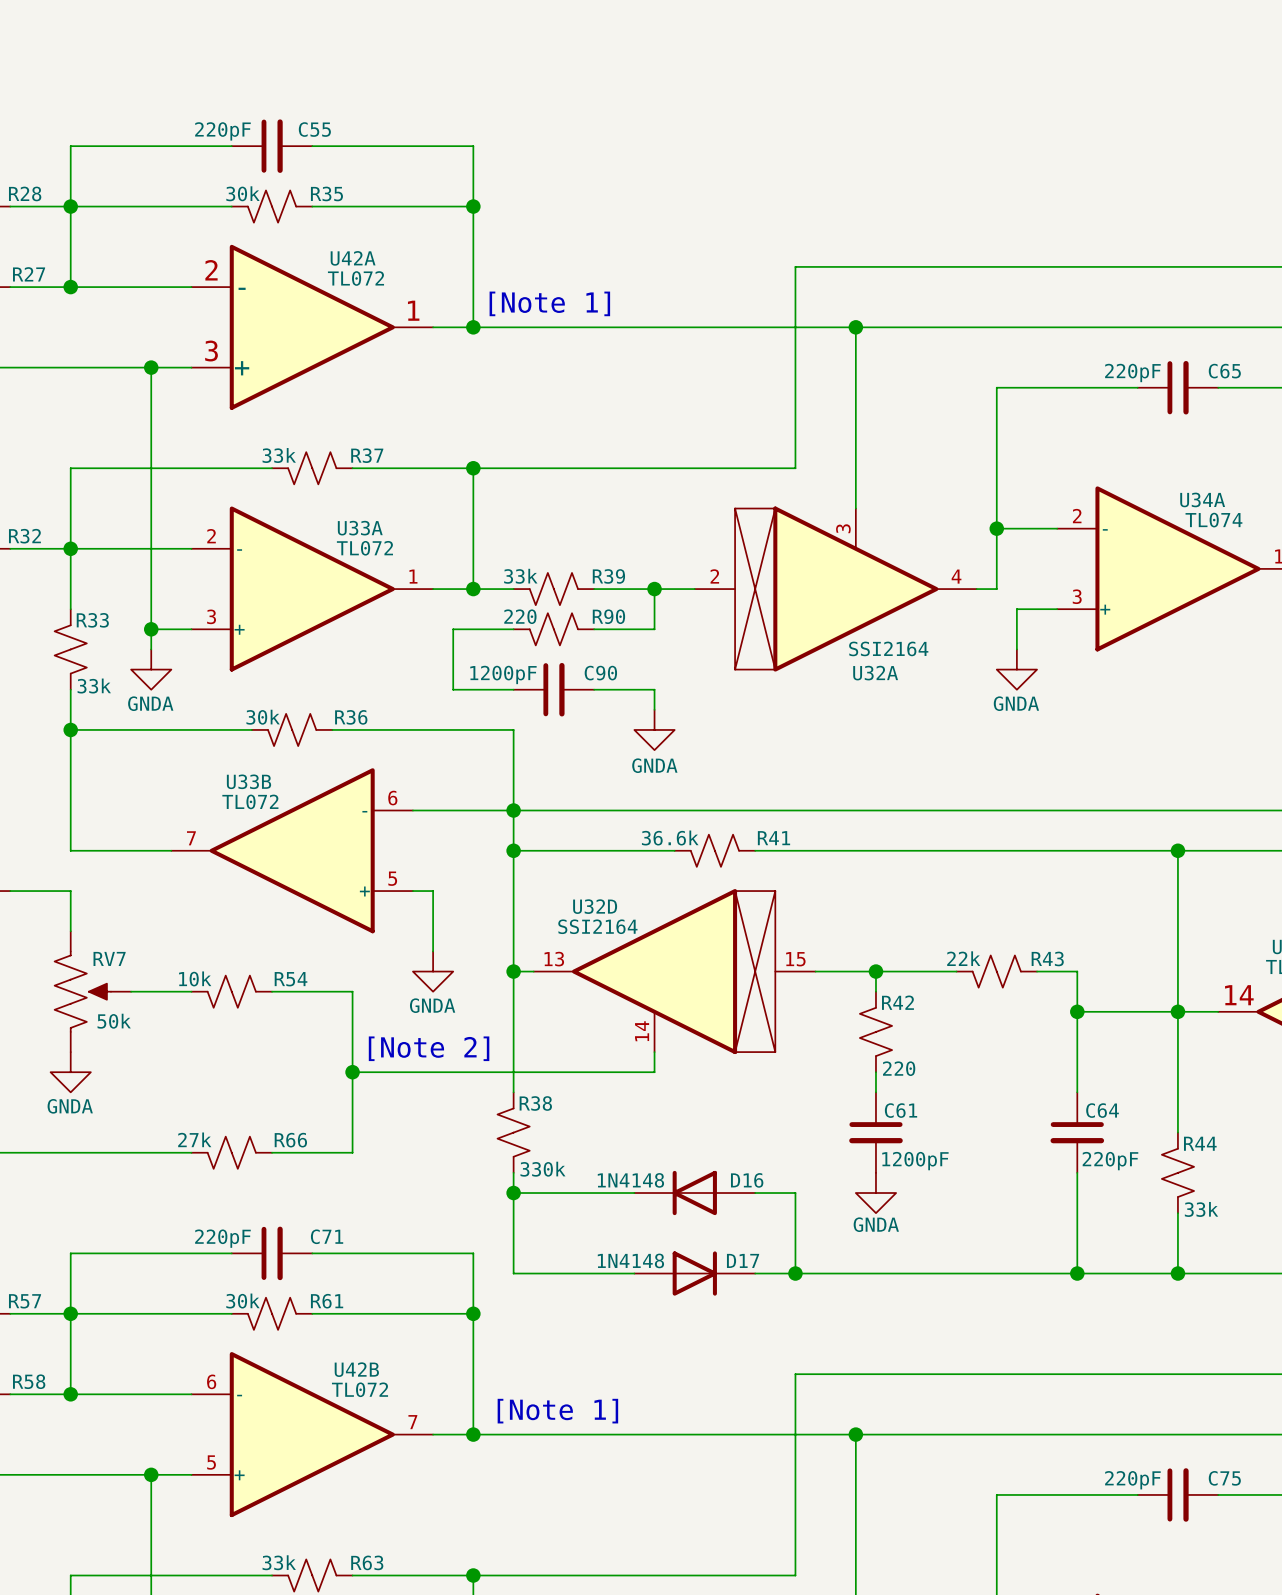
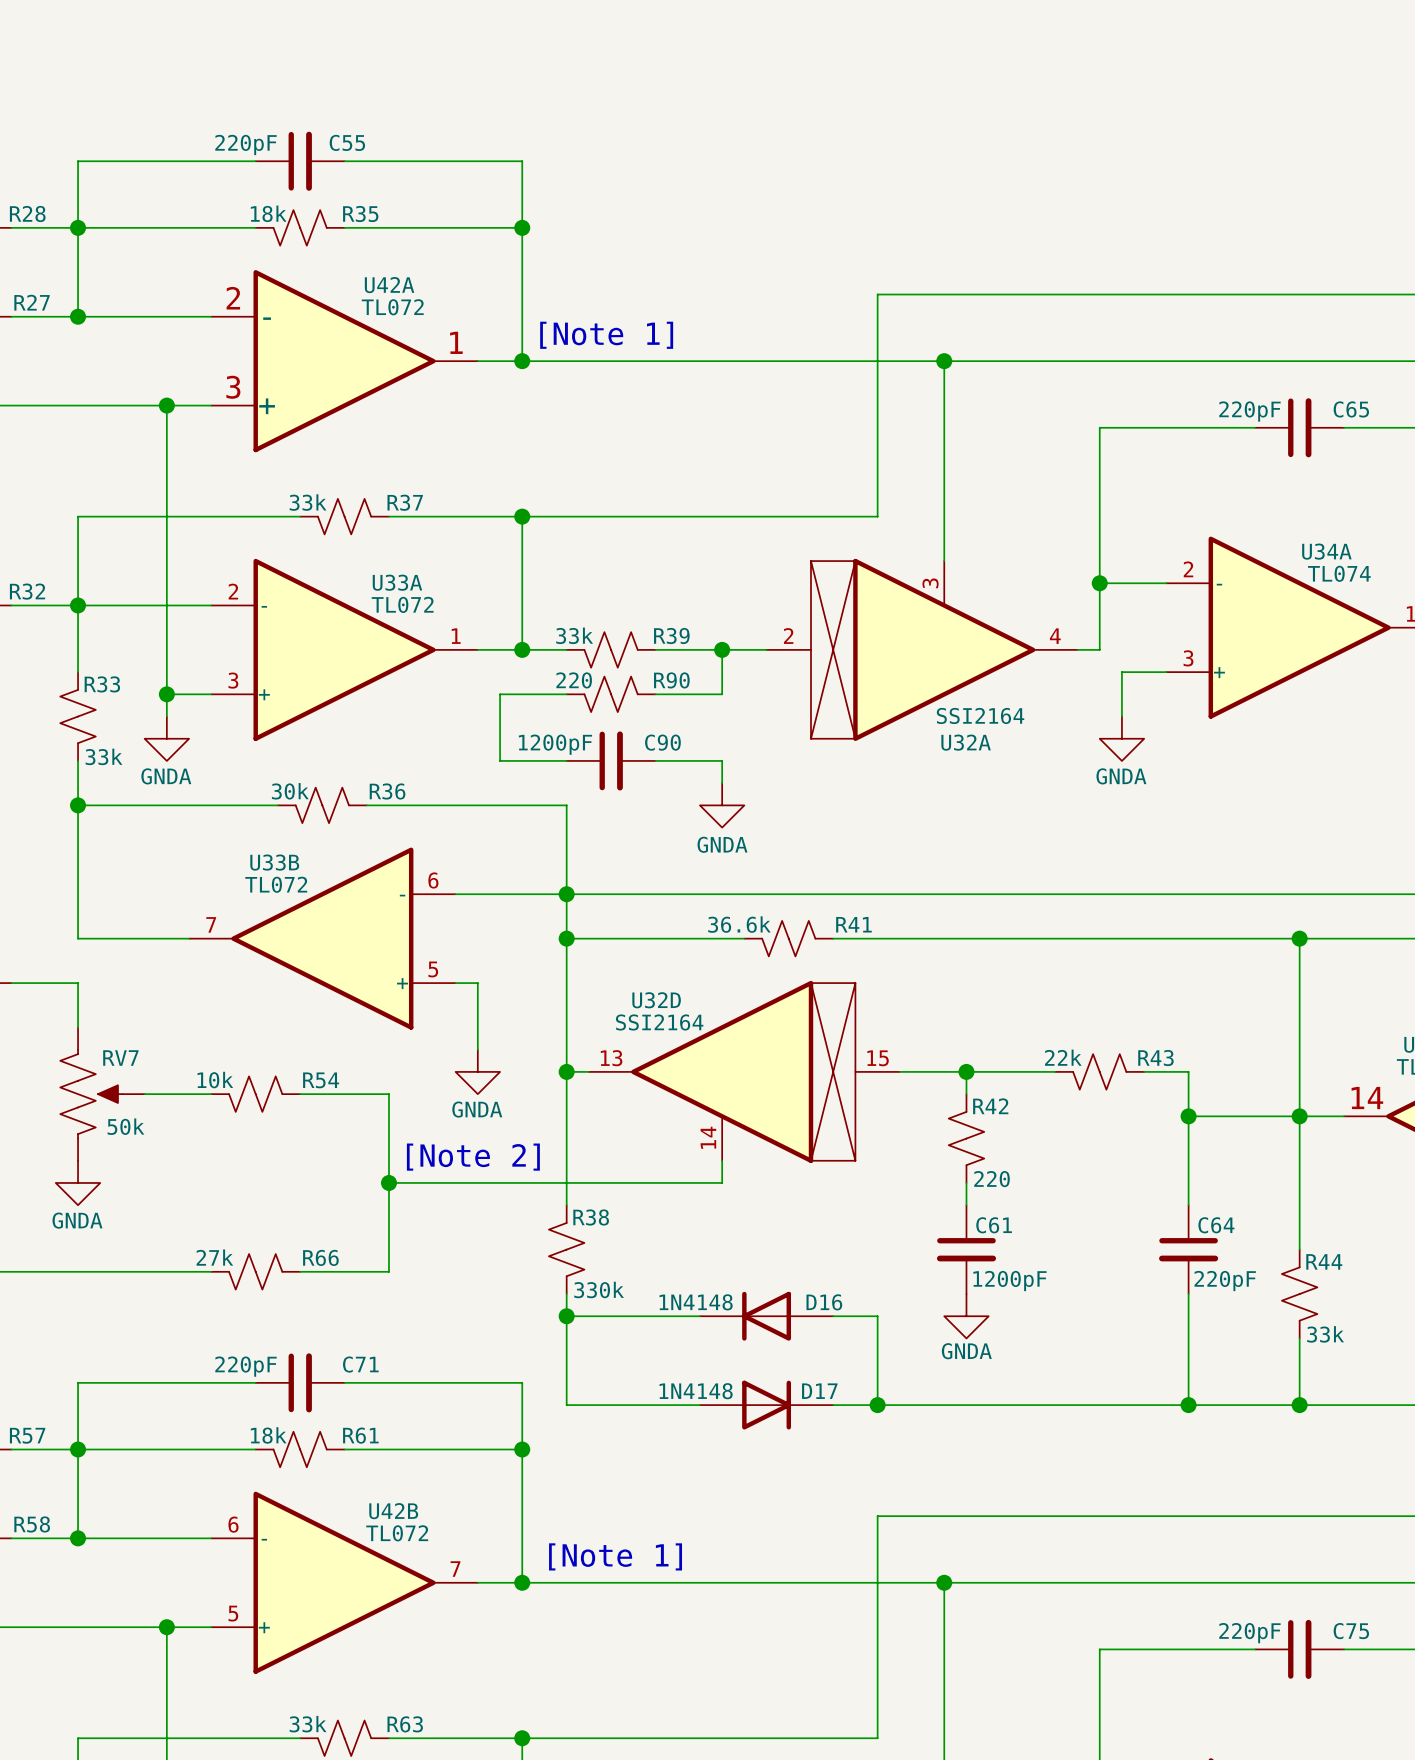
R35 value: 30k (243, 193) -> 18k (268, 213)
R61 value: 30k (243, 1301) -> 18k (268, 1435)

